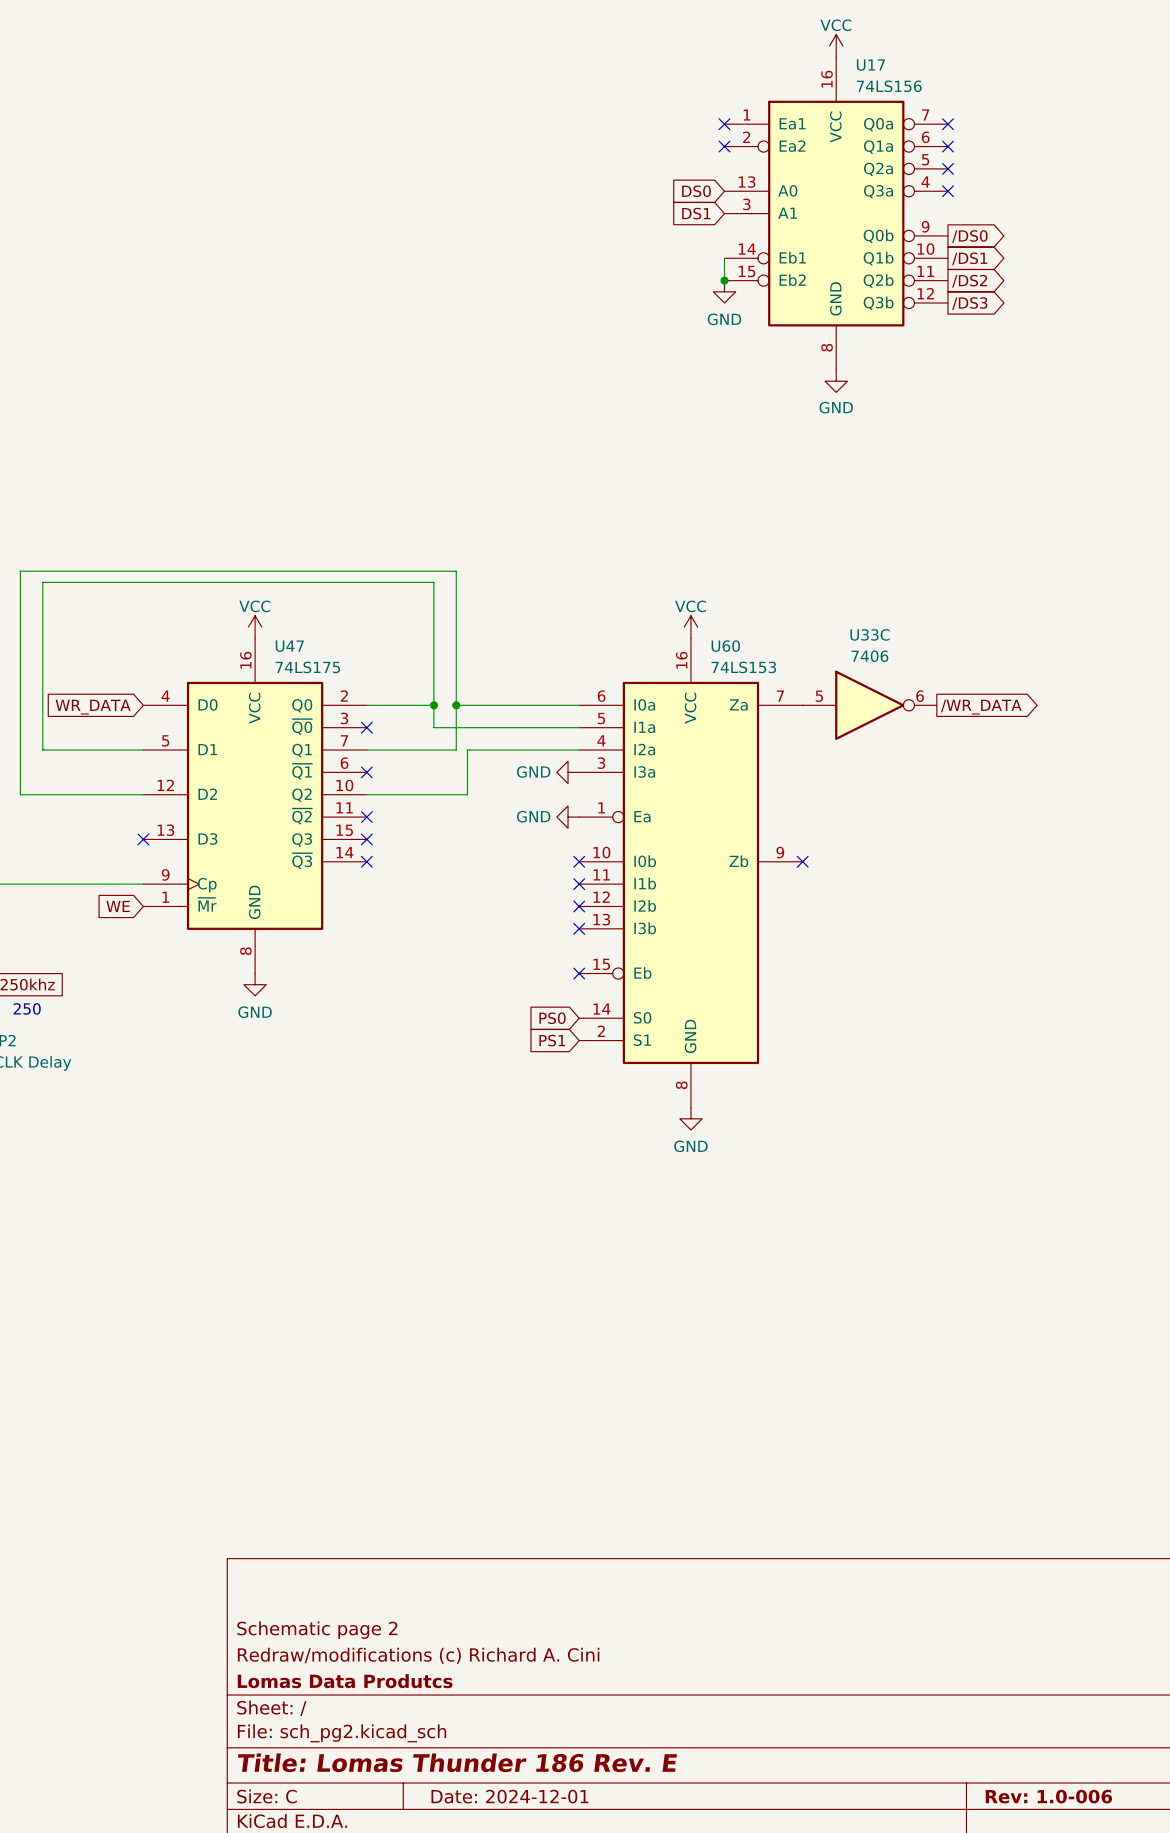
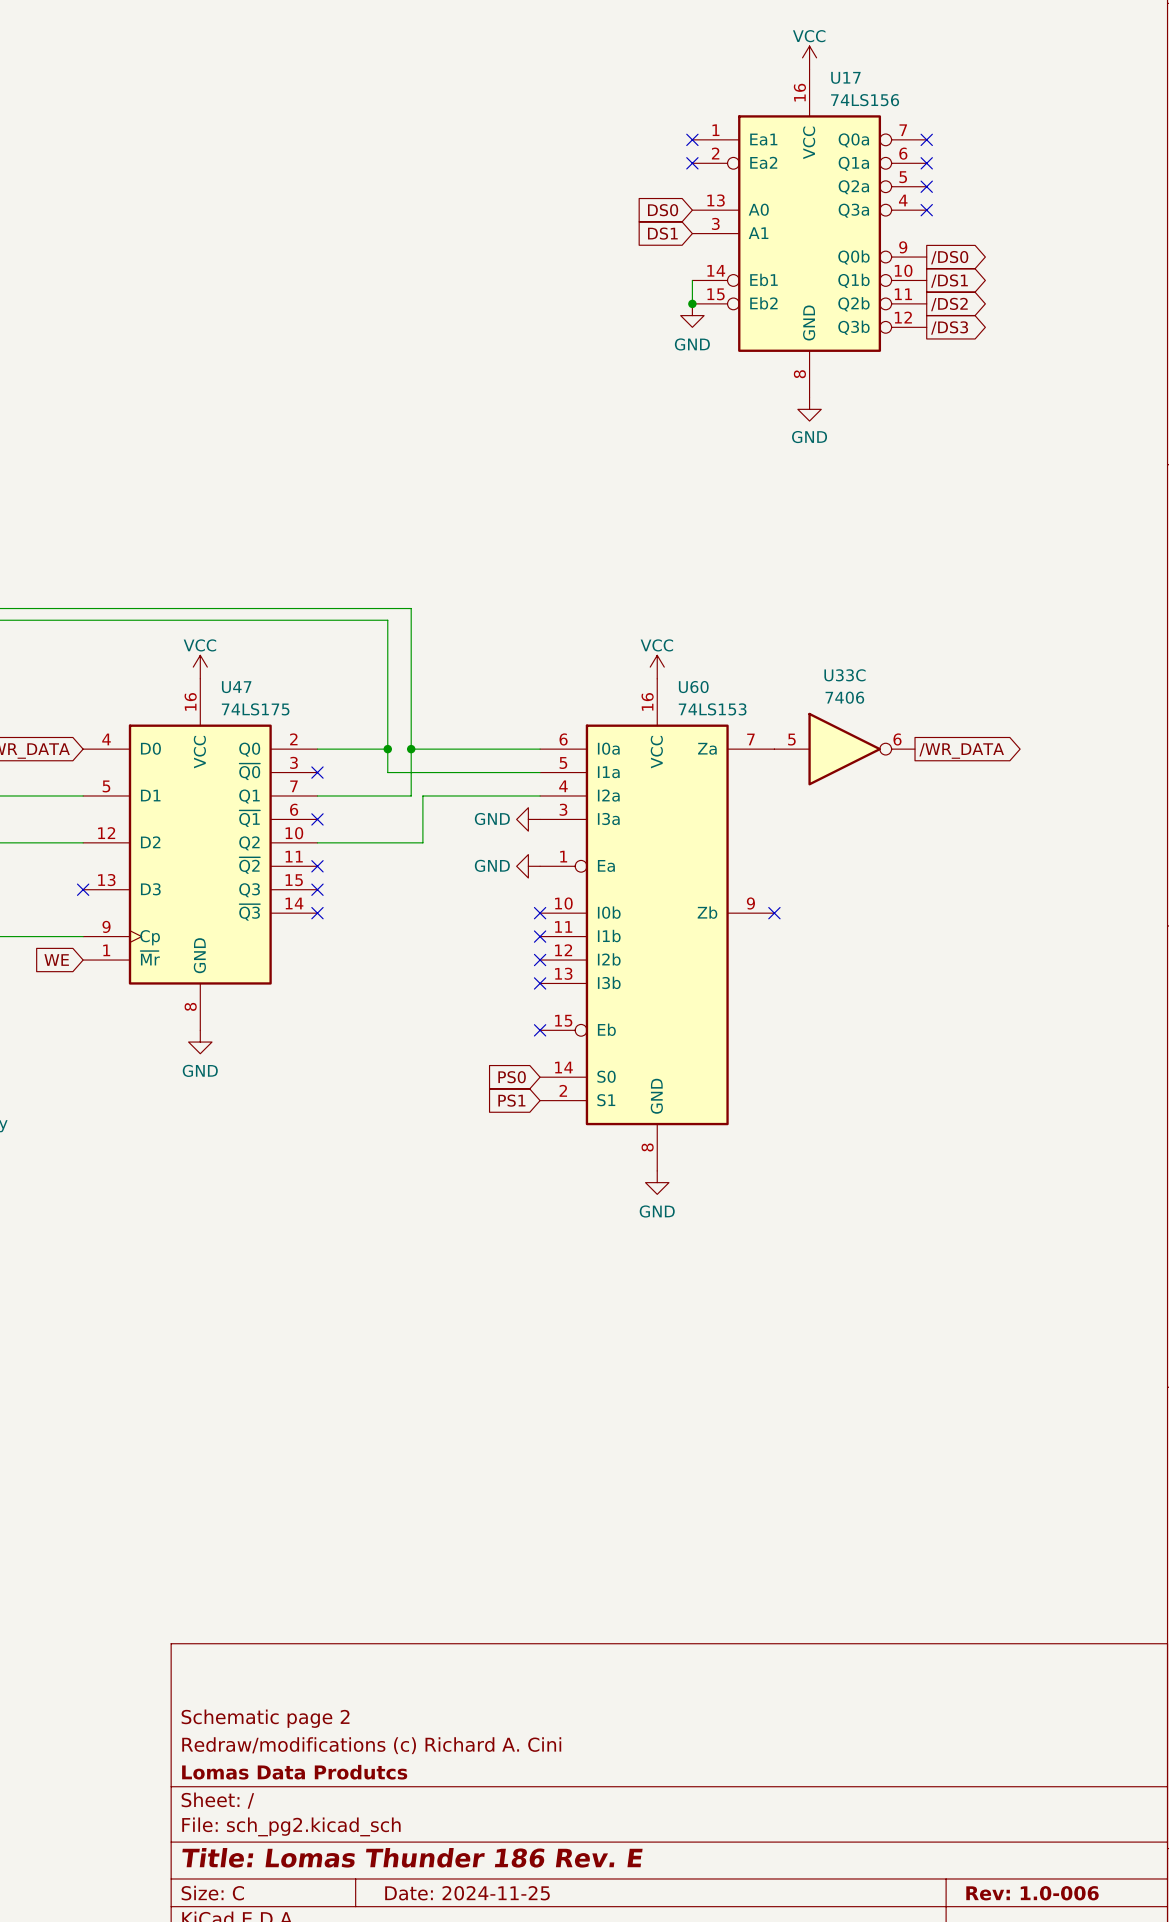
title block: Date: 2024-12-01 (509, 1796) -> Date: 2024-11-25 (467, 1893)

